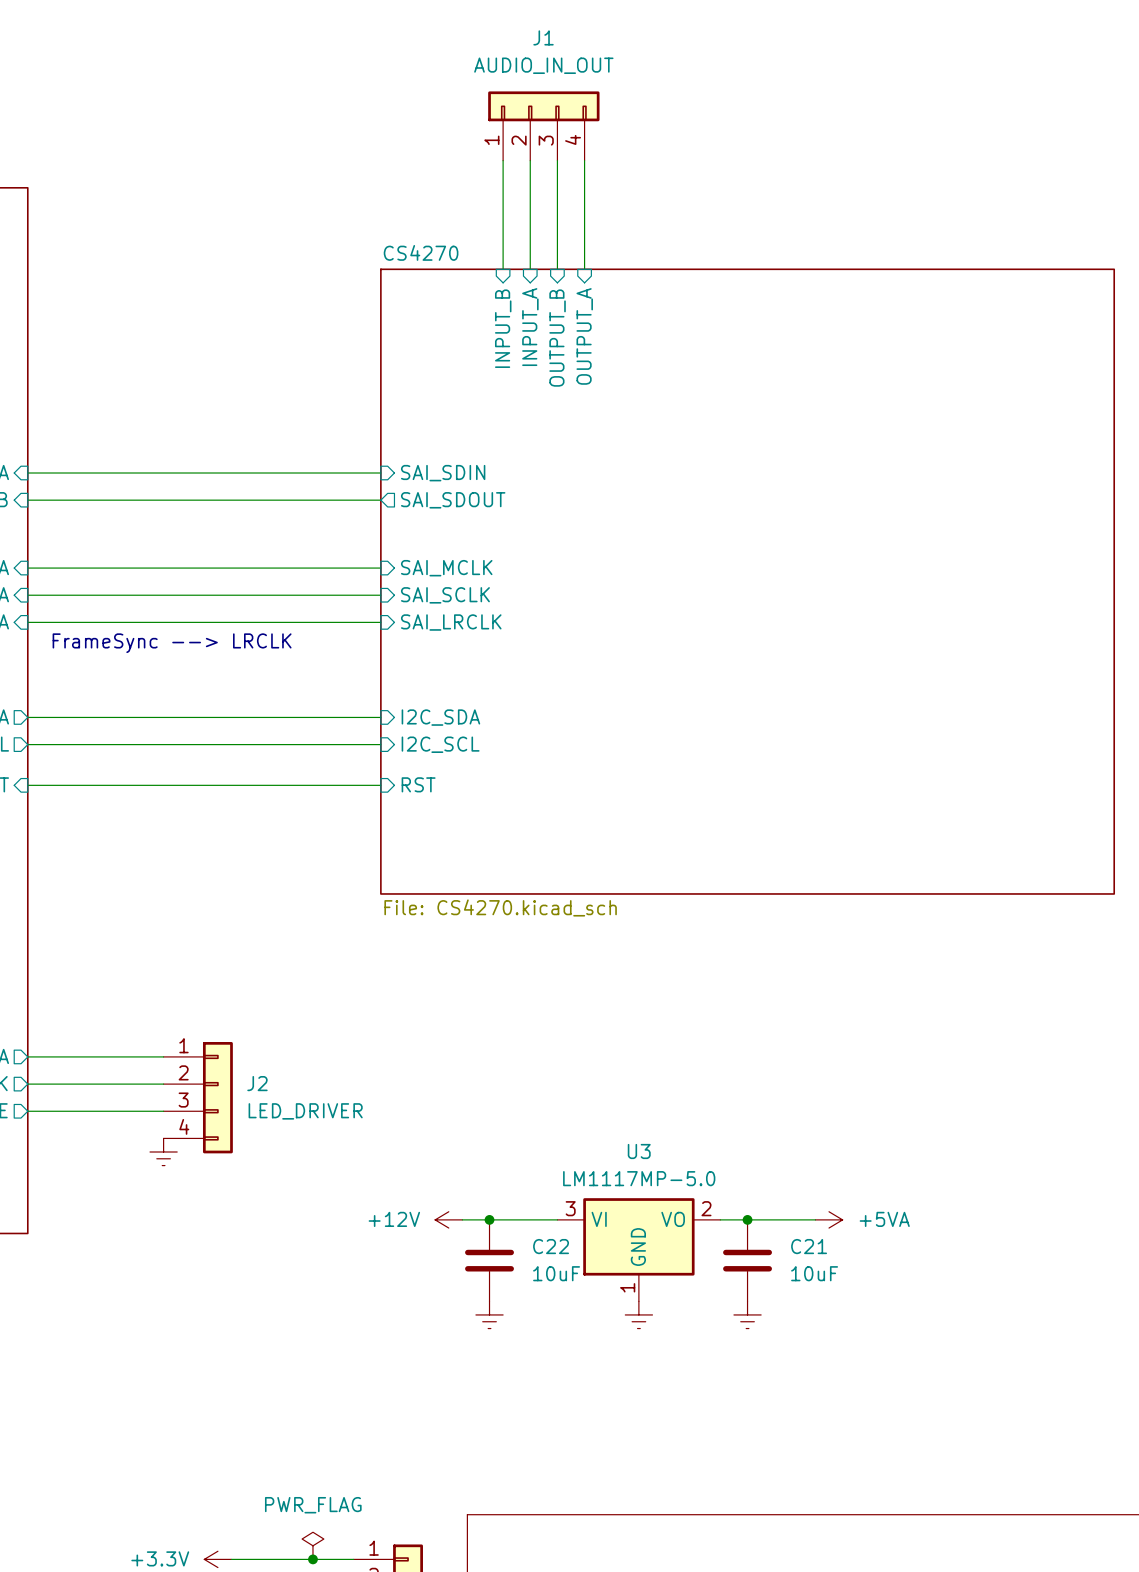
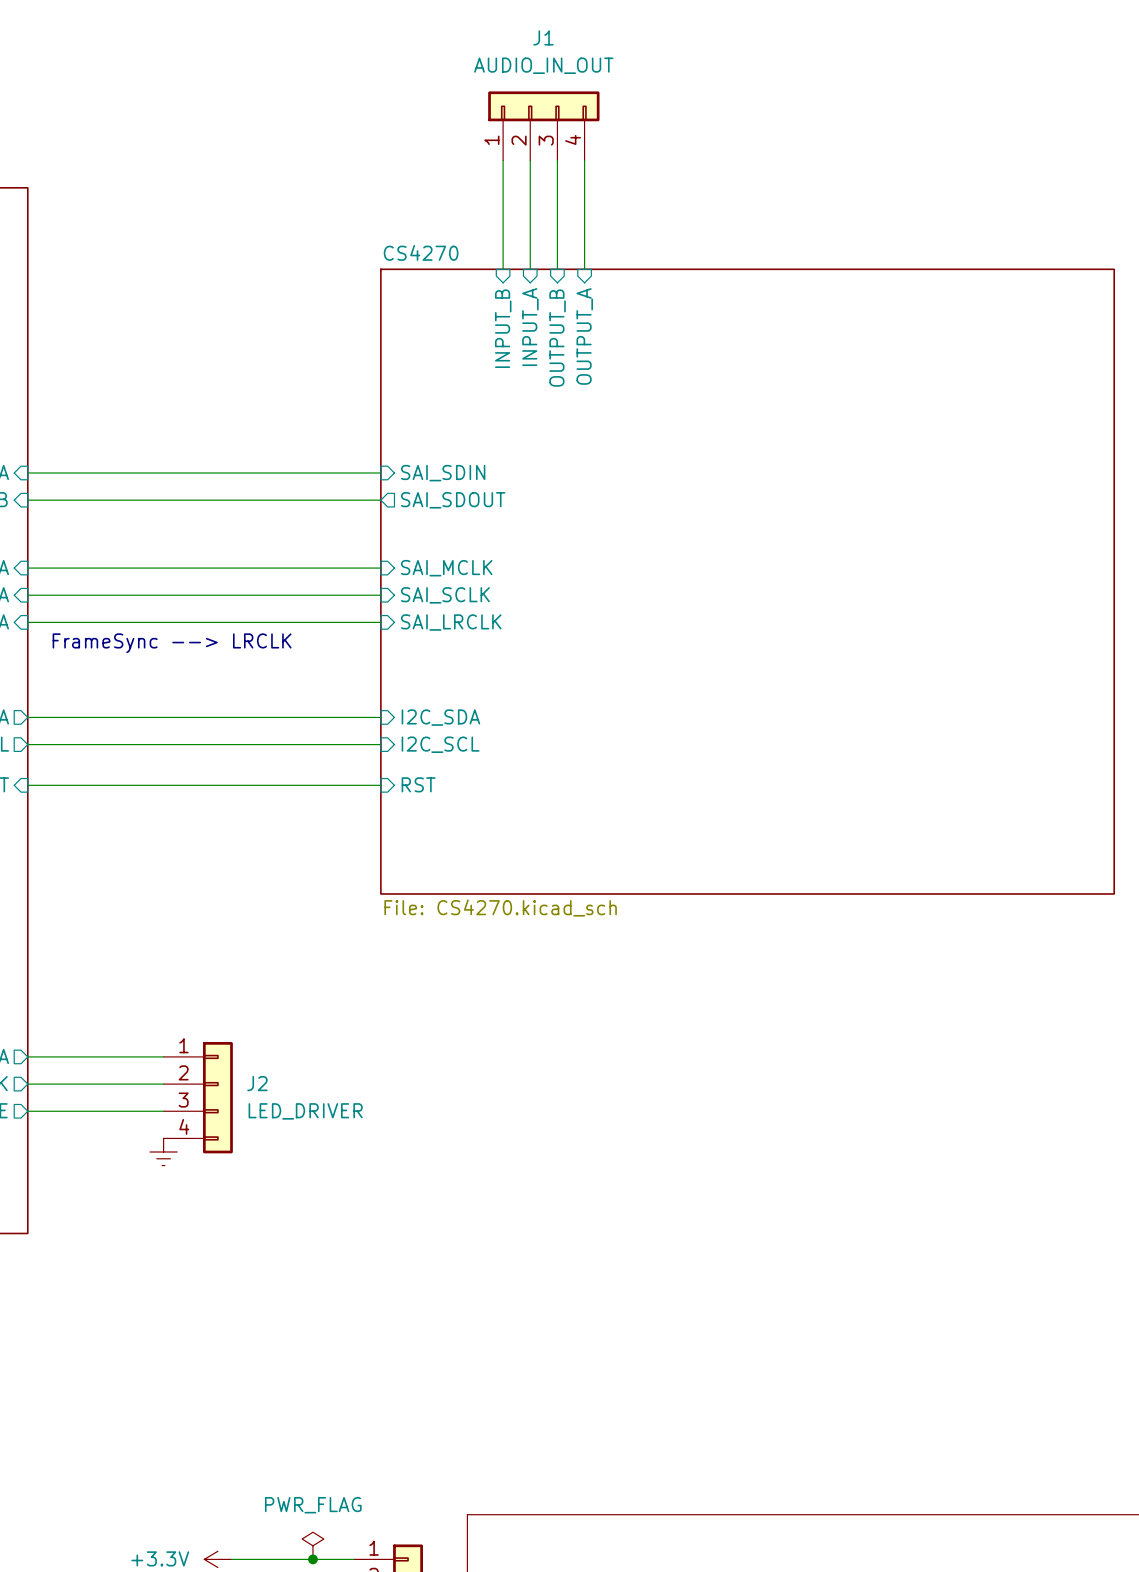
power symbol: +12V (448, 1219) -> none
wire: (462, 1219) (557, 1219) -> none
junction: (489, 1219) -> none
wire: (720, 1219) (815, 1219) -> none
junction: (747, 1219) -> none
power symbol: +5VA (829, 1219) -> none
U3: LM1117MP-5.0 (638, 1249) -> none
C22: 10uF (489, 1260) -> none
C21: 10uF (747, 1260) -> none
power symbol: (489, 1314) -> none
power symbol: (638, 1314) -> none
power symbol: (747, 1314) -> none

